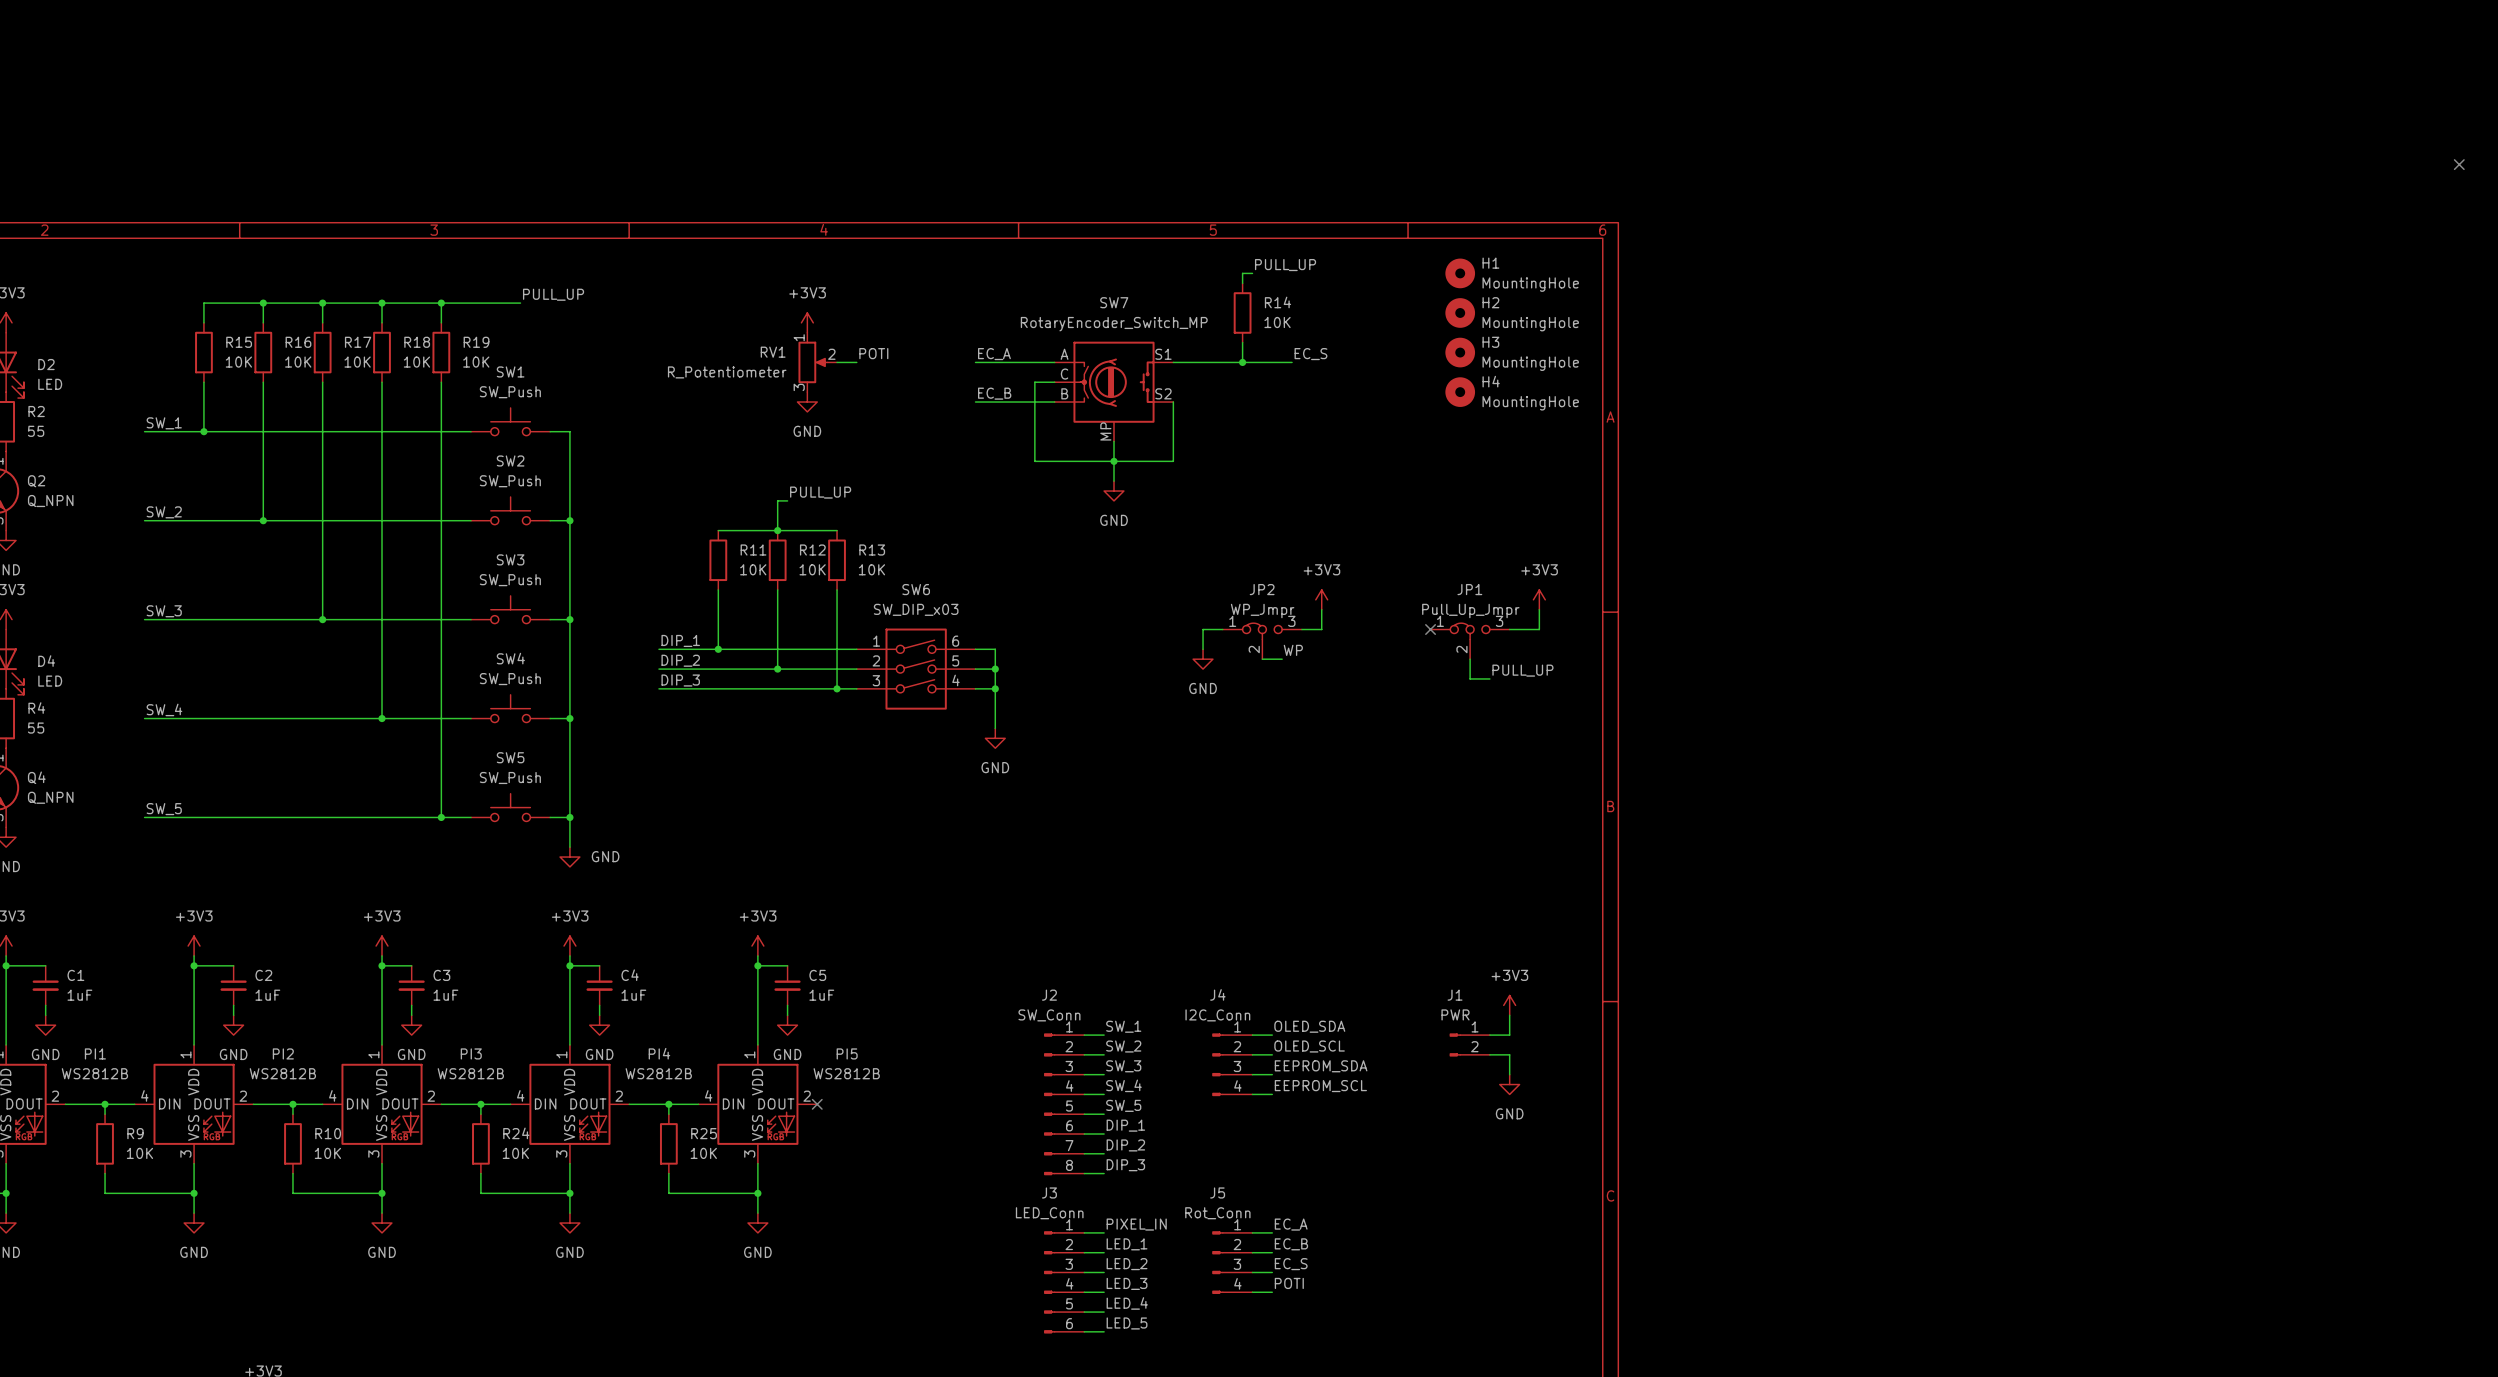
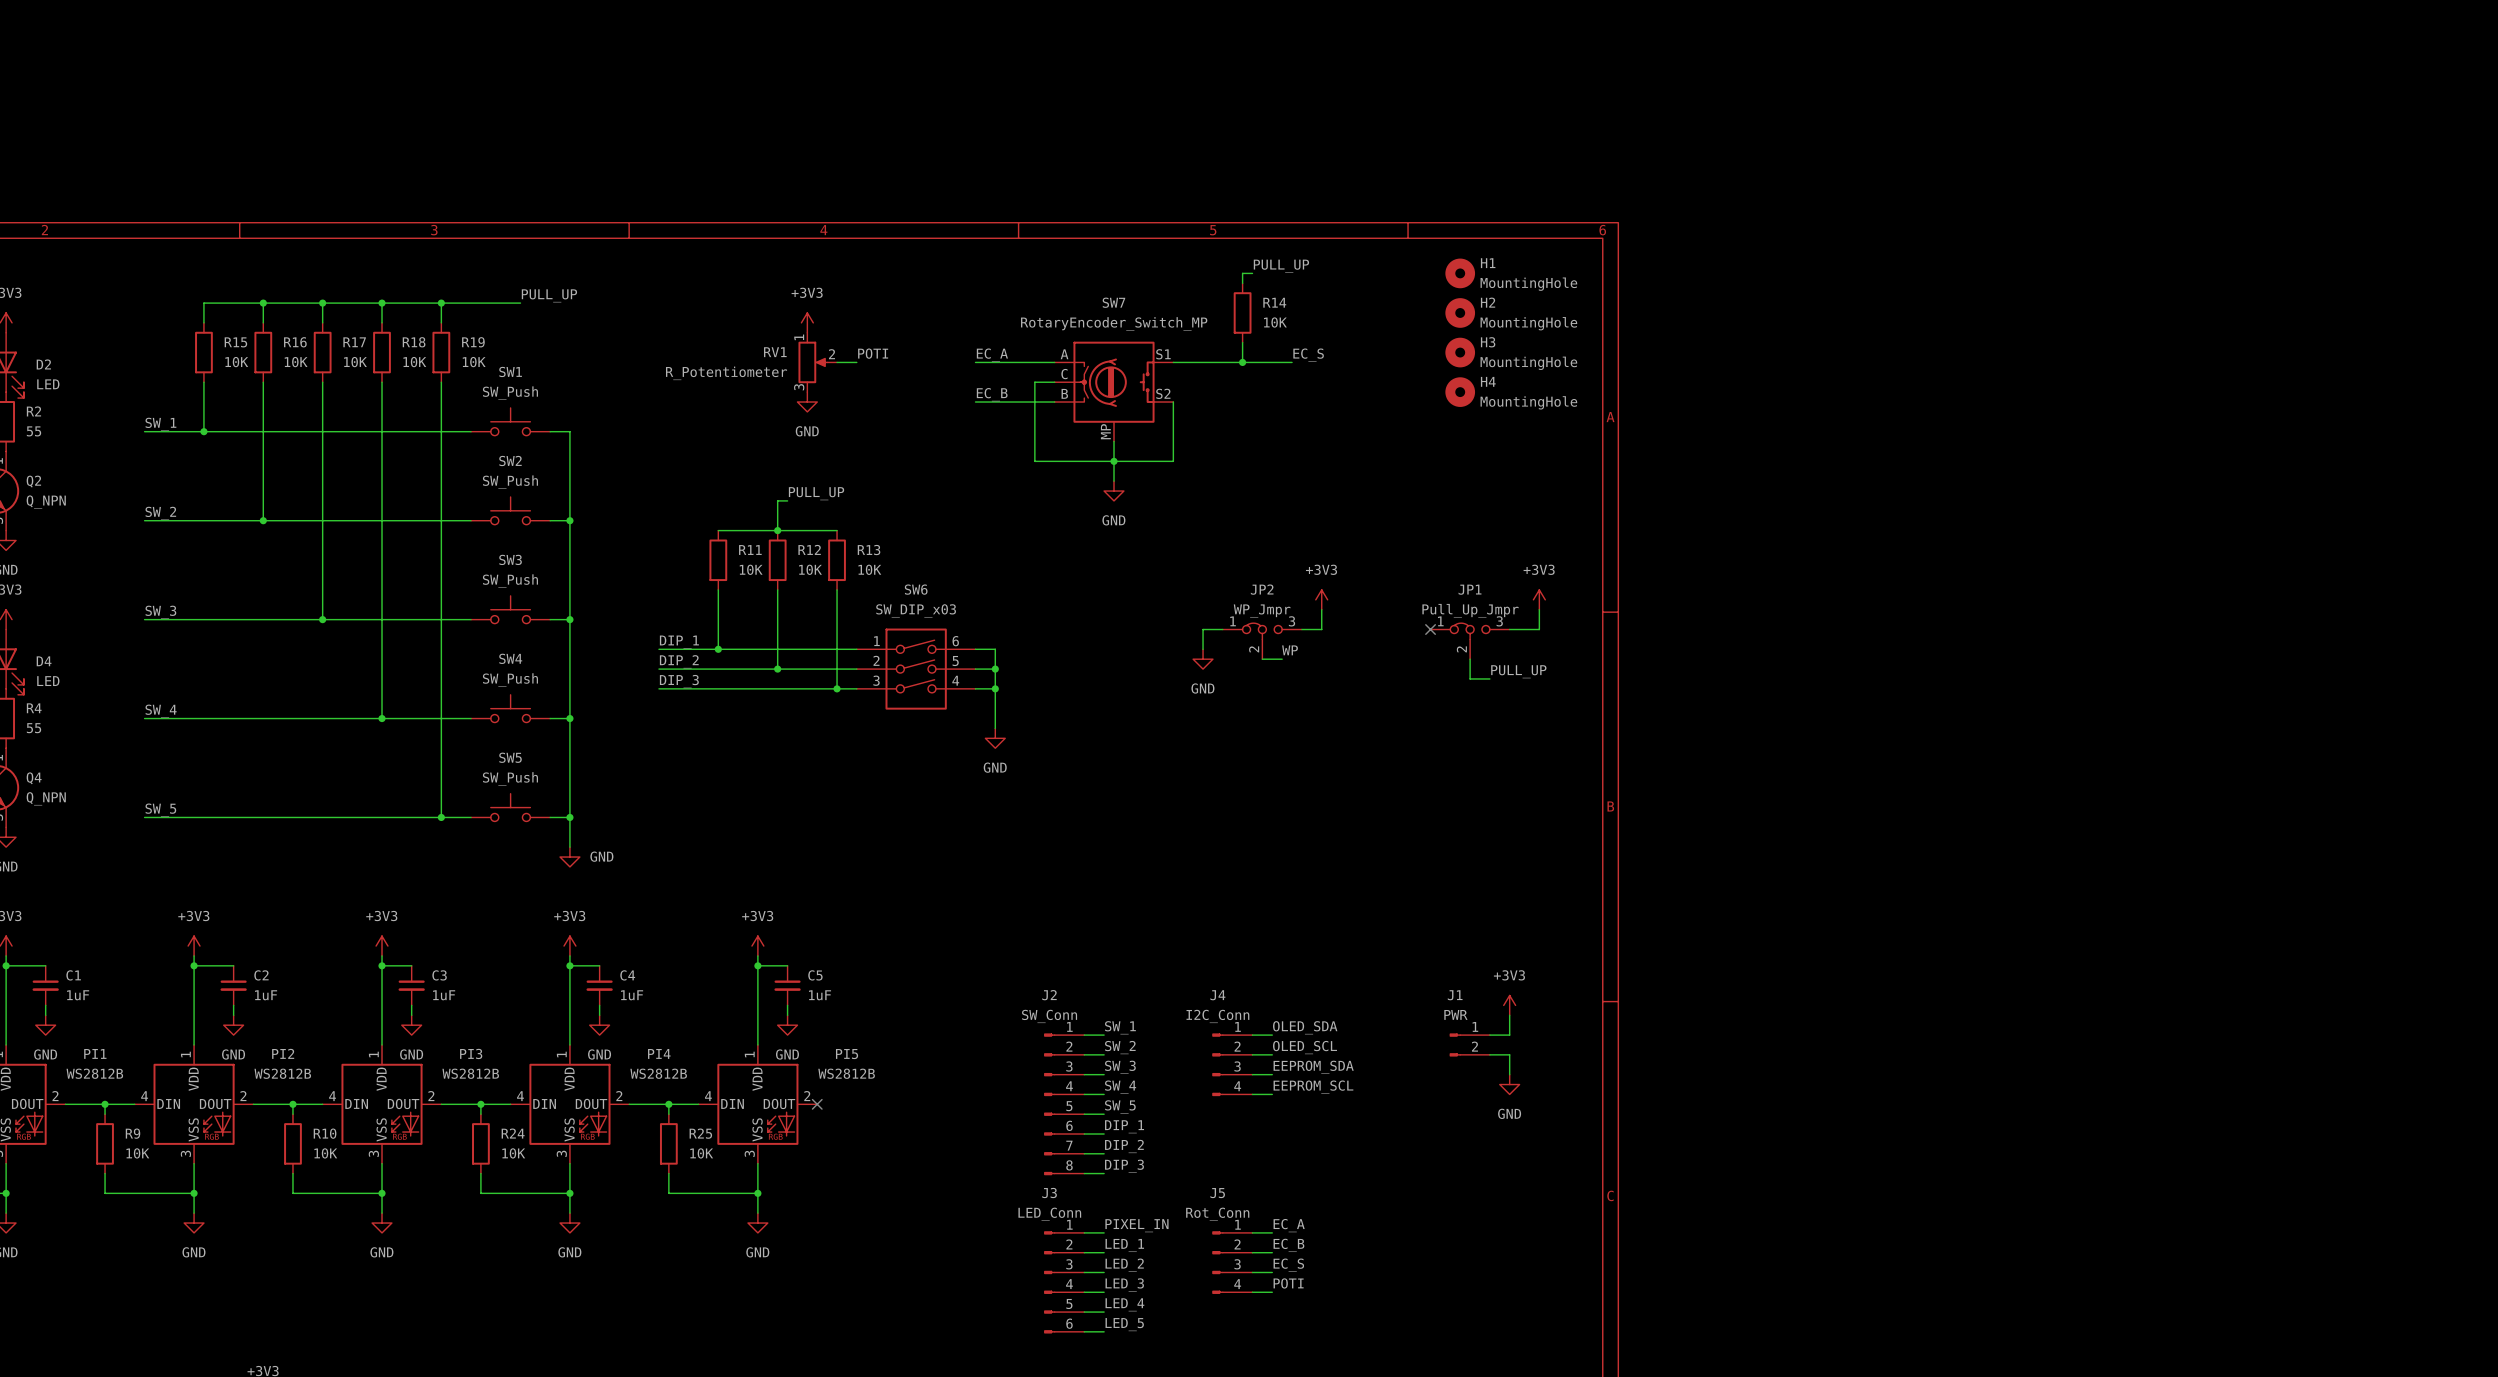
no-connect mark: (2459, 164) -> none

